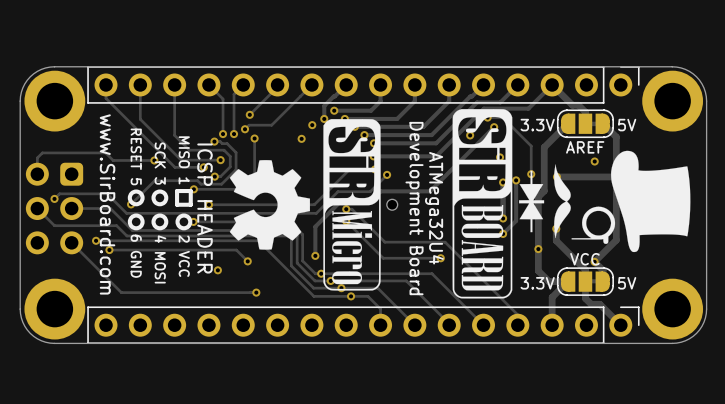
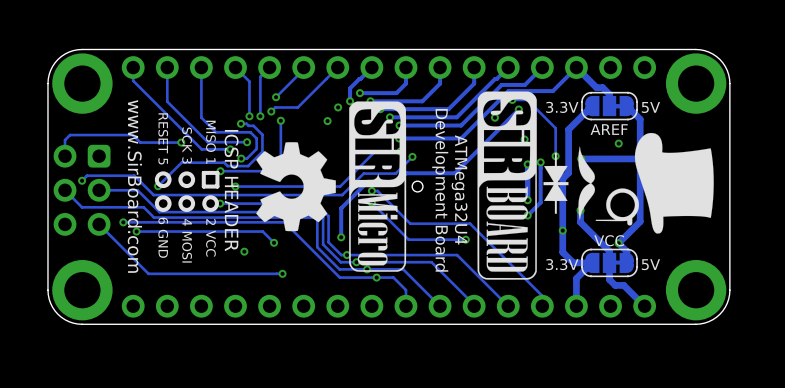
part side: bottom (363, 84) -> top (388, 67)
part side: bottom (363, 325) -> top (388, 306)

